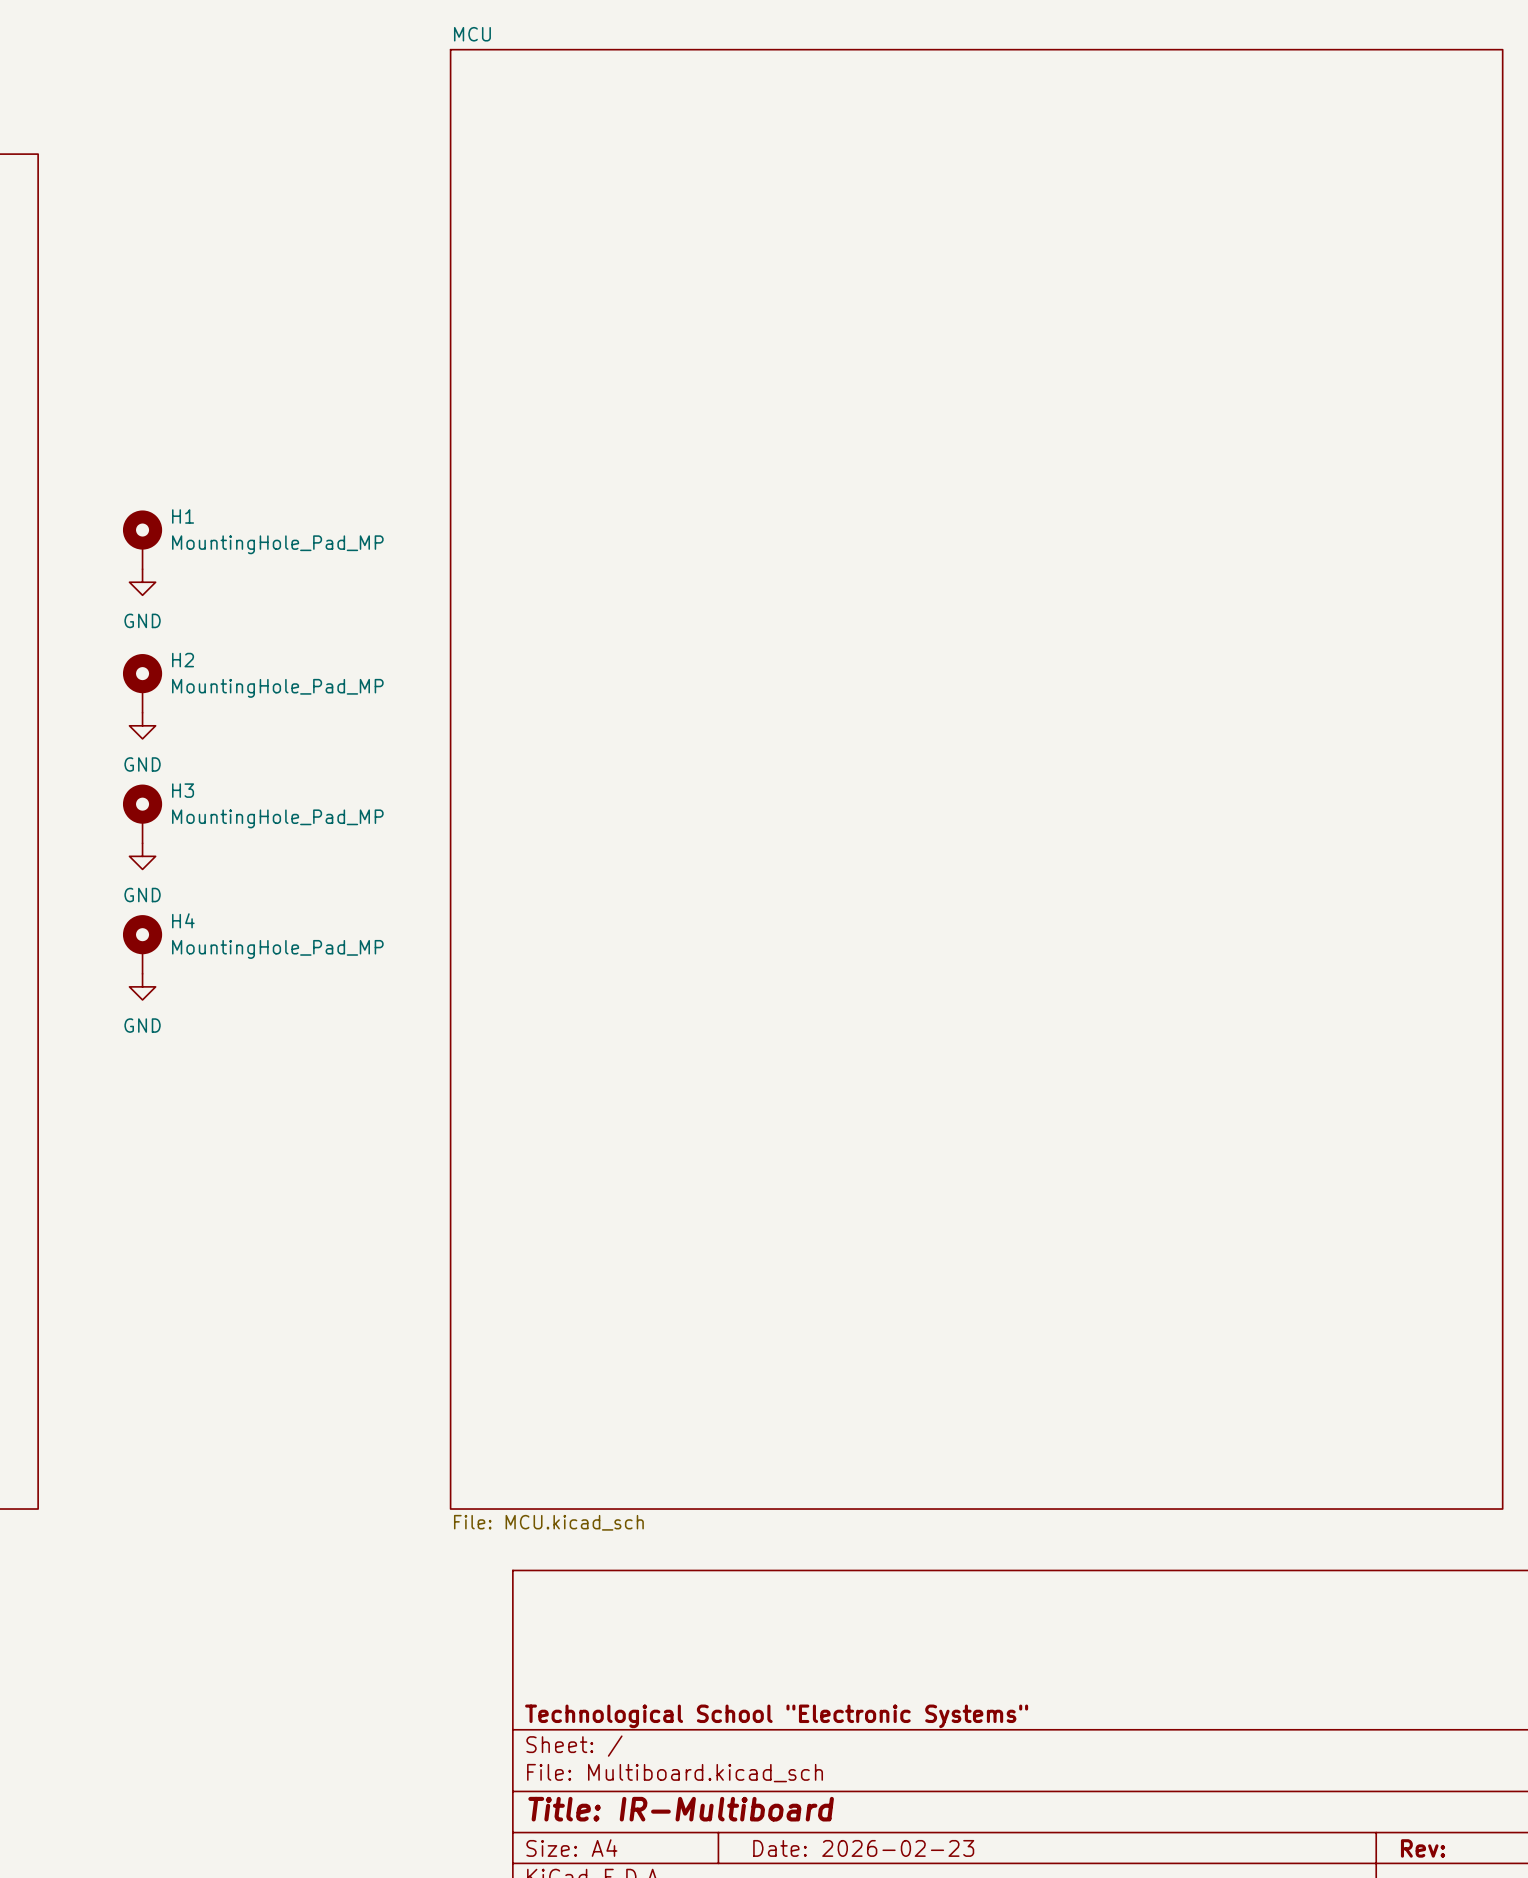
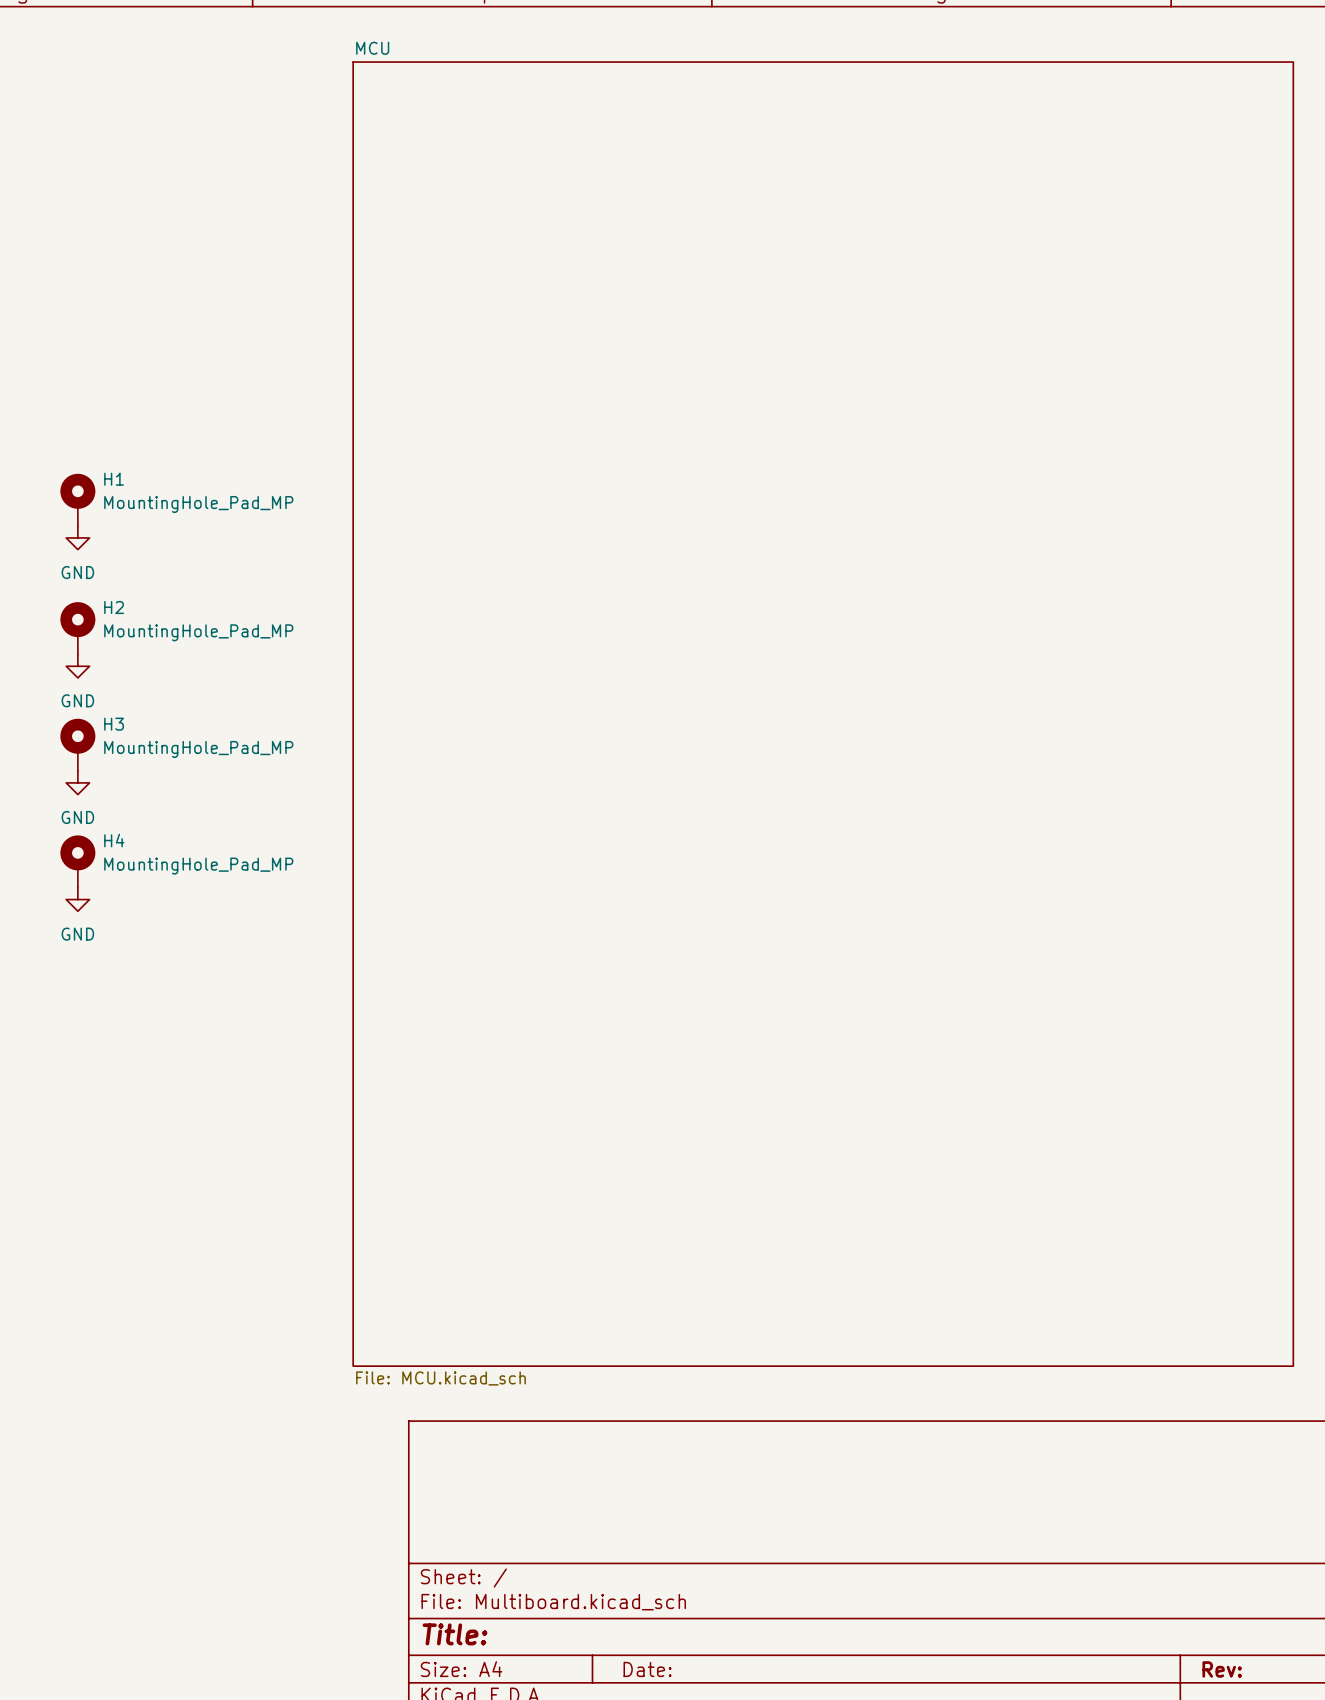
title block: Technological School "Electronic Systems" (776, 1716) -> none
title block: Title: IR-Multiboard (681, 1809) -> Title: (455, 1634)
title block: Date: 2026-02-23 (863, 1848) -> Date: (647, 1669)

